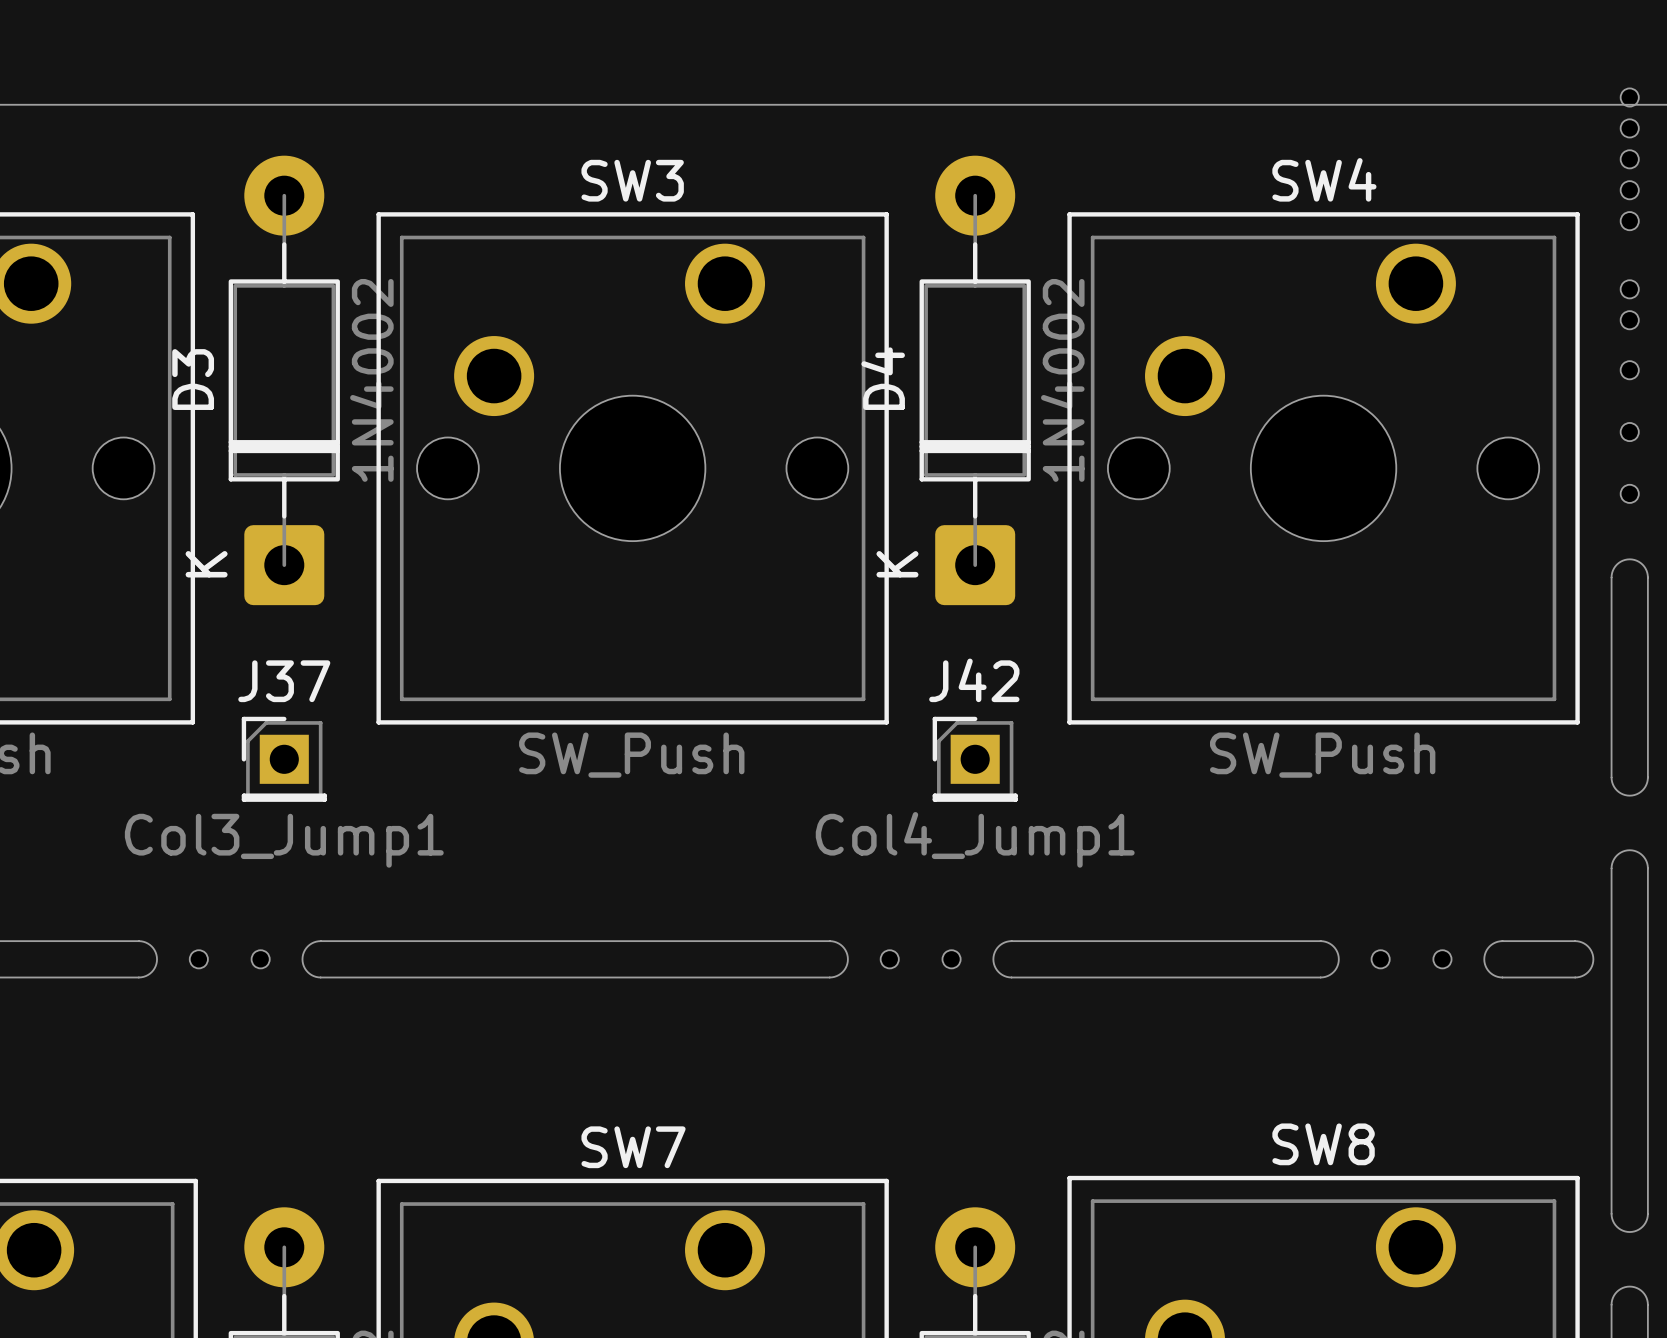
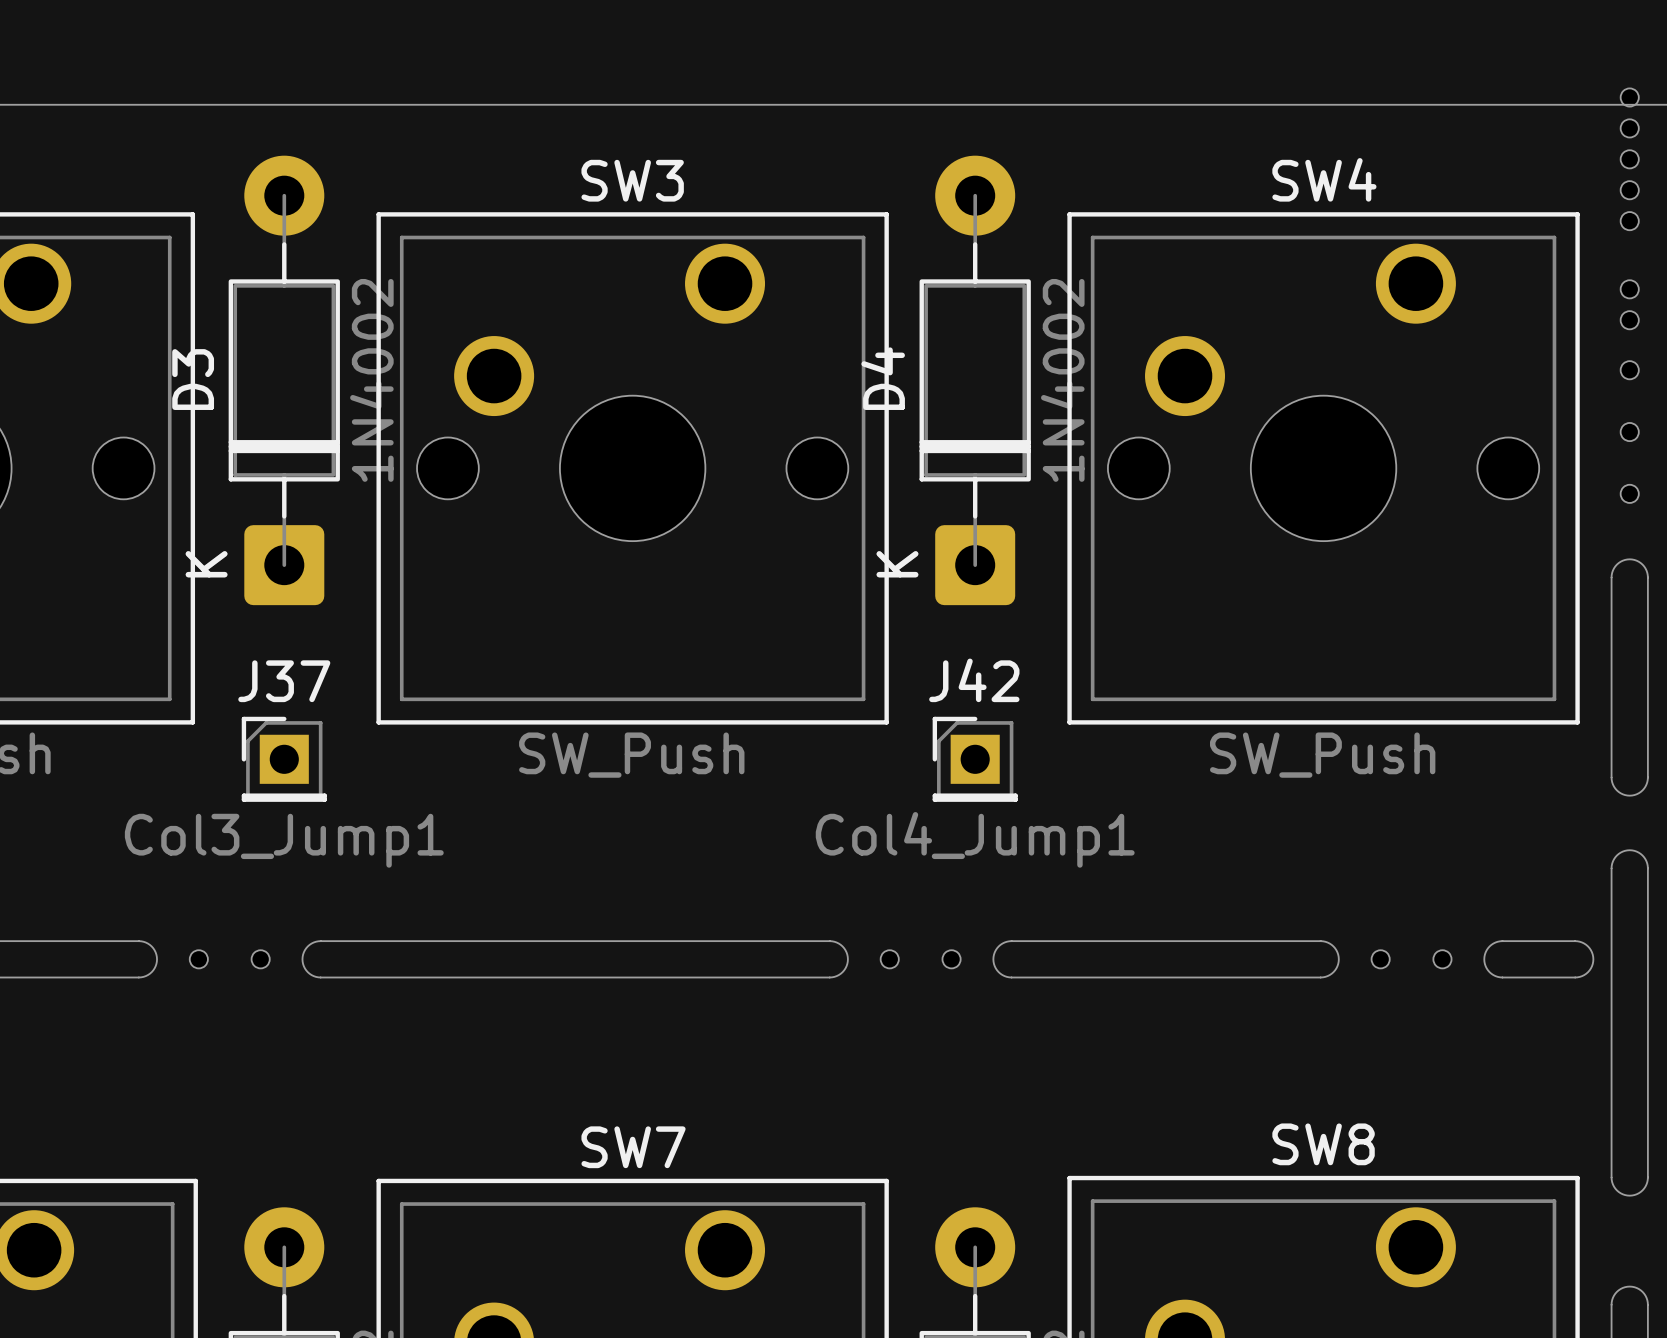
board edge: (1611, 1177) (1612, 1218) (1618, 1228) (1629, 1232) (1640, 1228) (1647, 1218) (1647, 1177) -> (1611, 1177) (1616, 1190) (1629, 1195) (1642, 1190) (1647, 1177)

